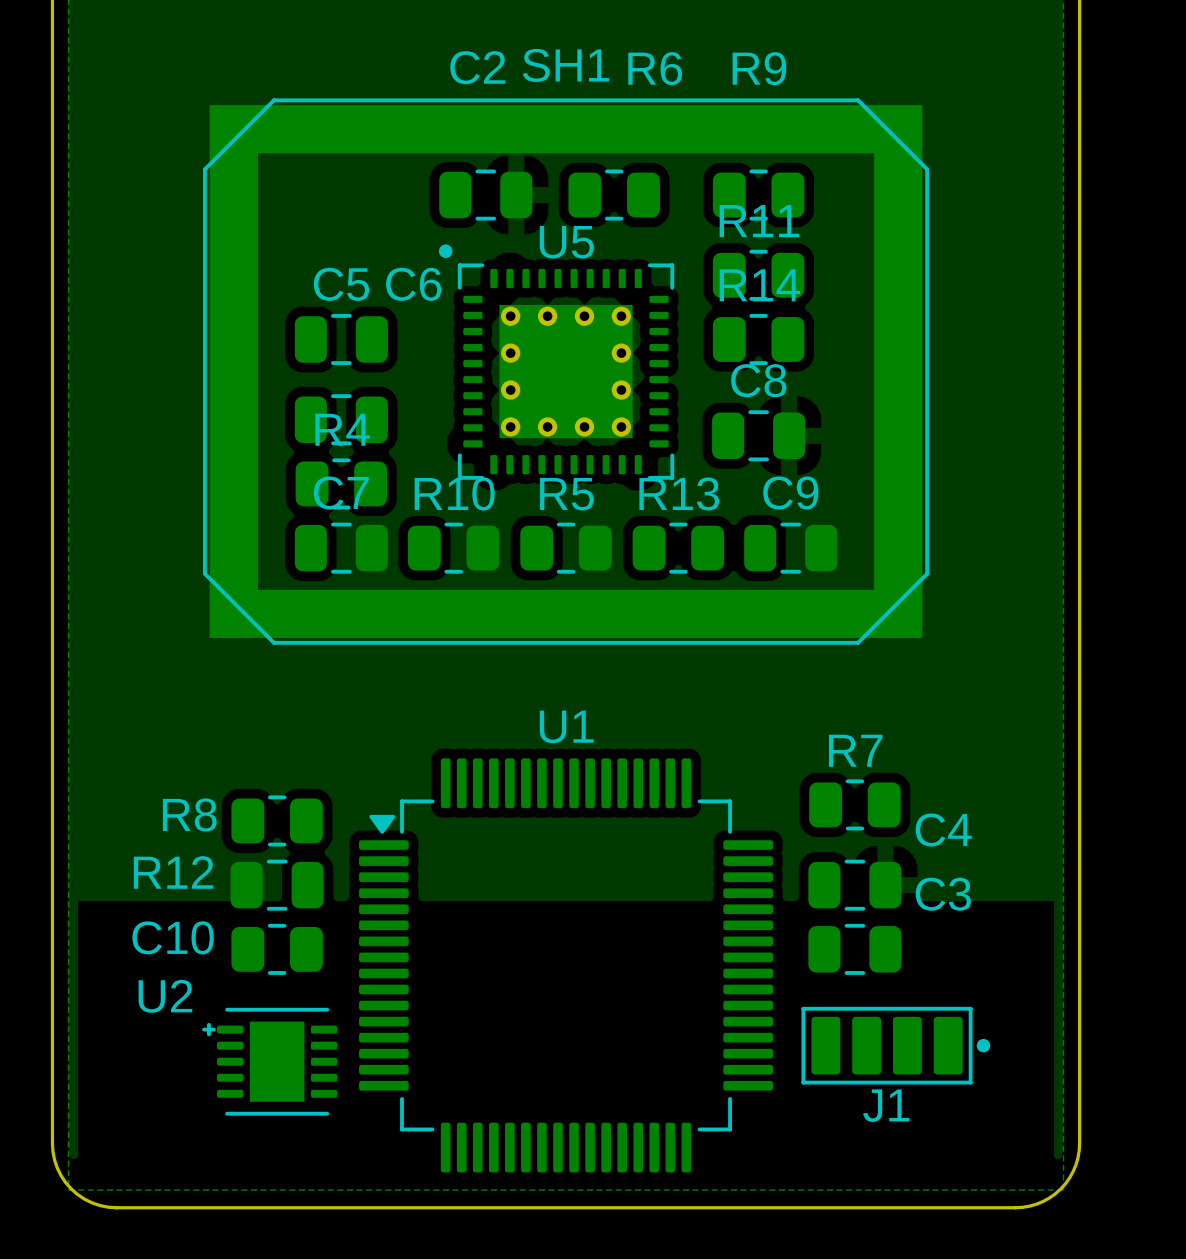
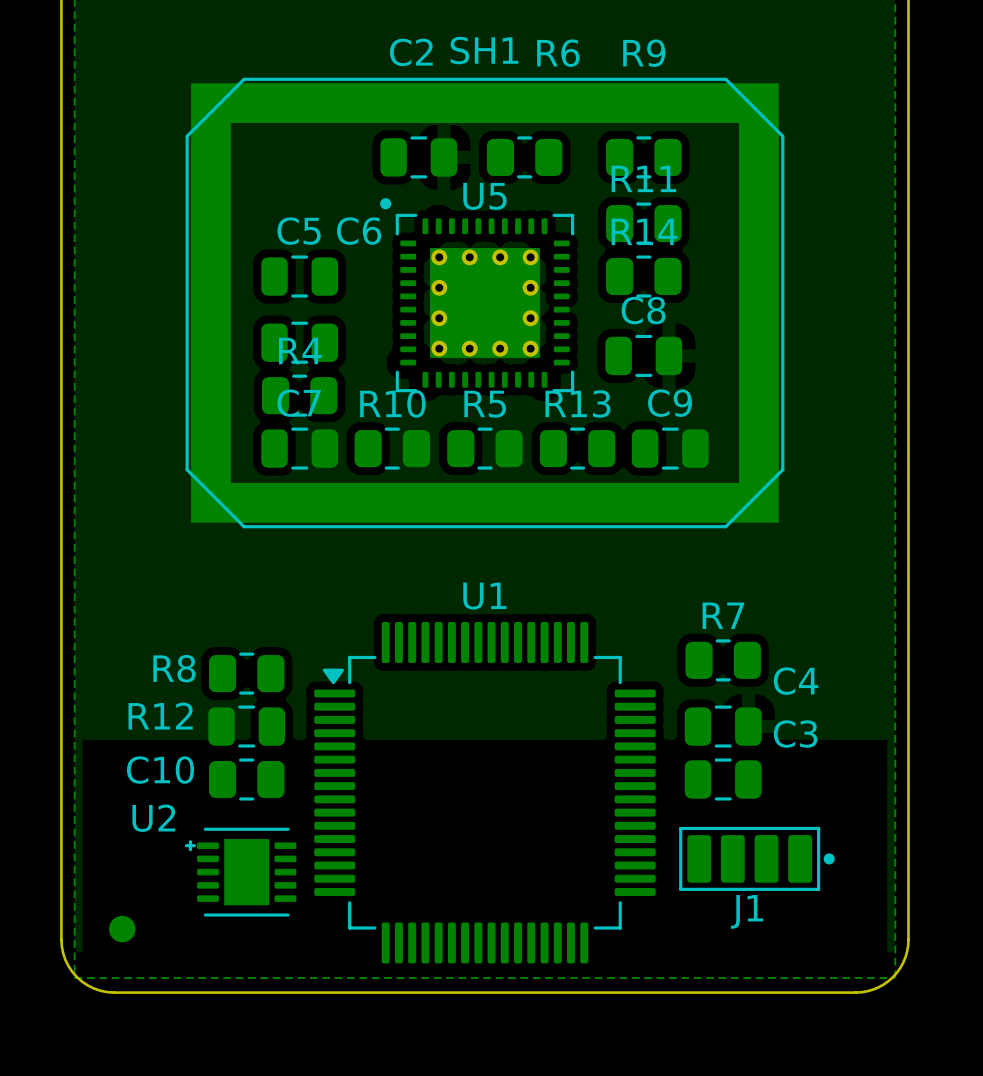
part: none -> (122, 929)

